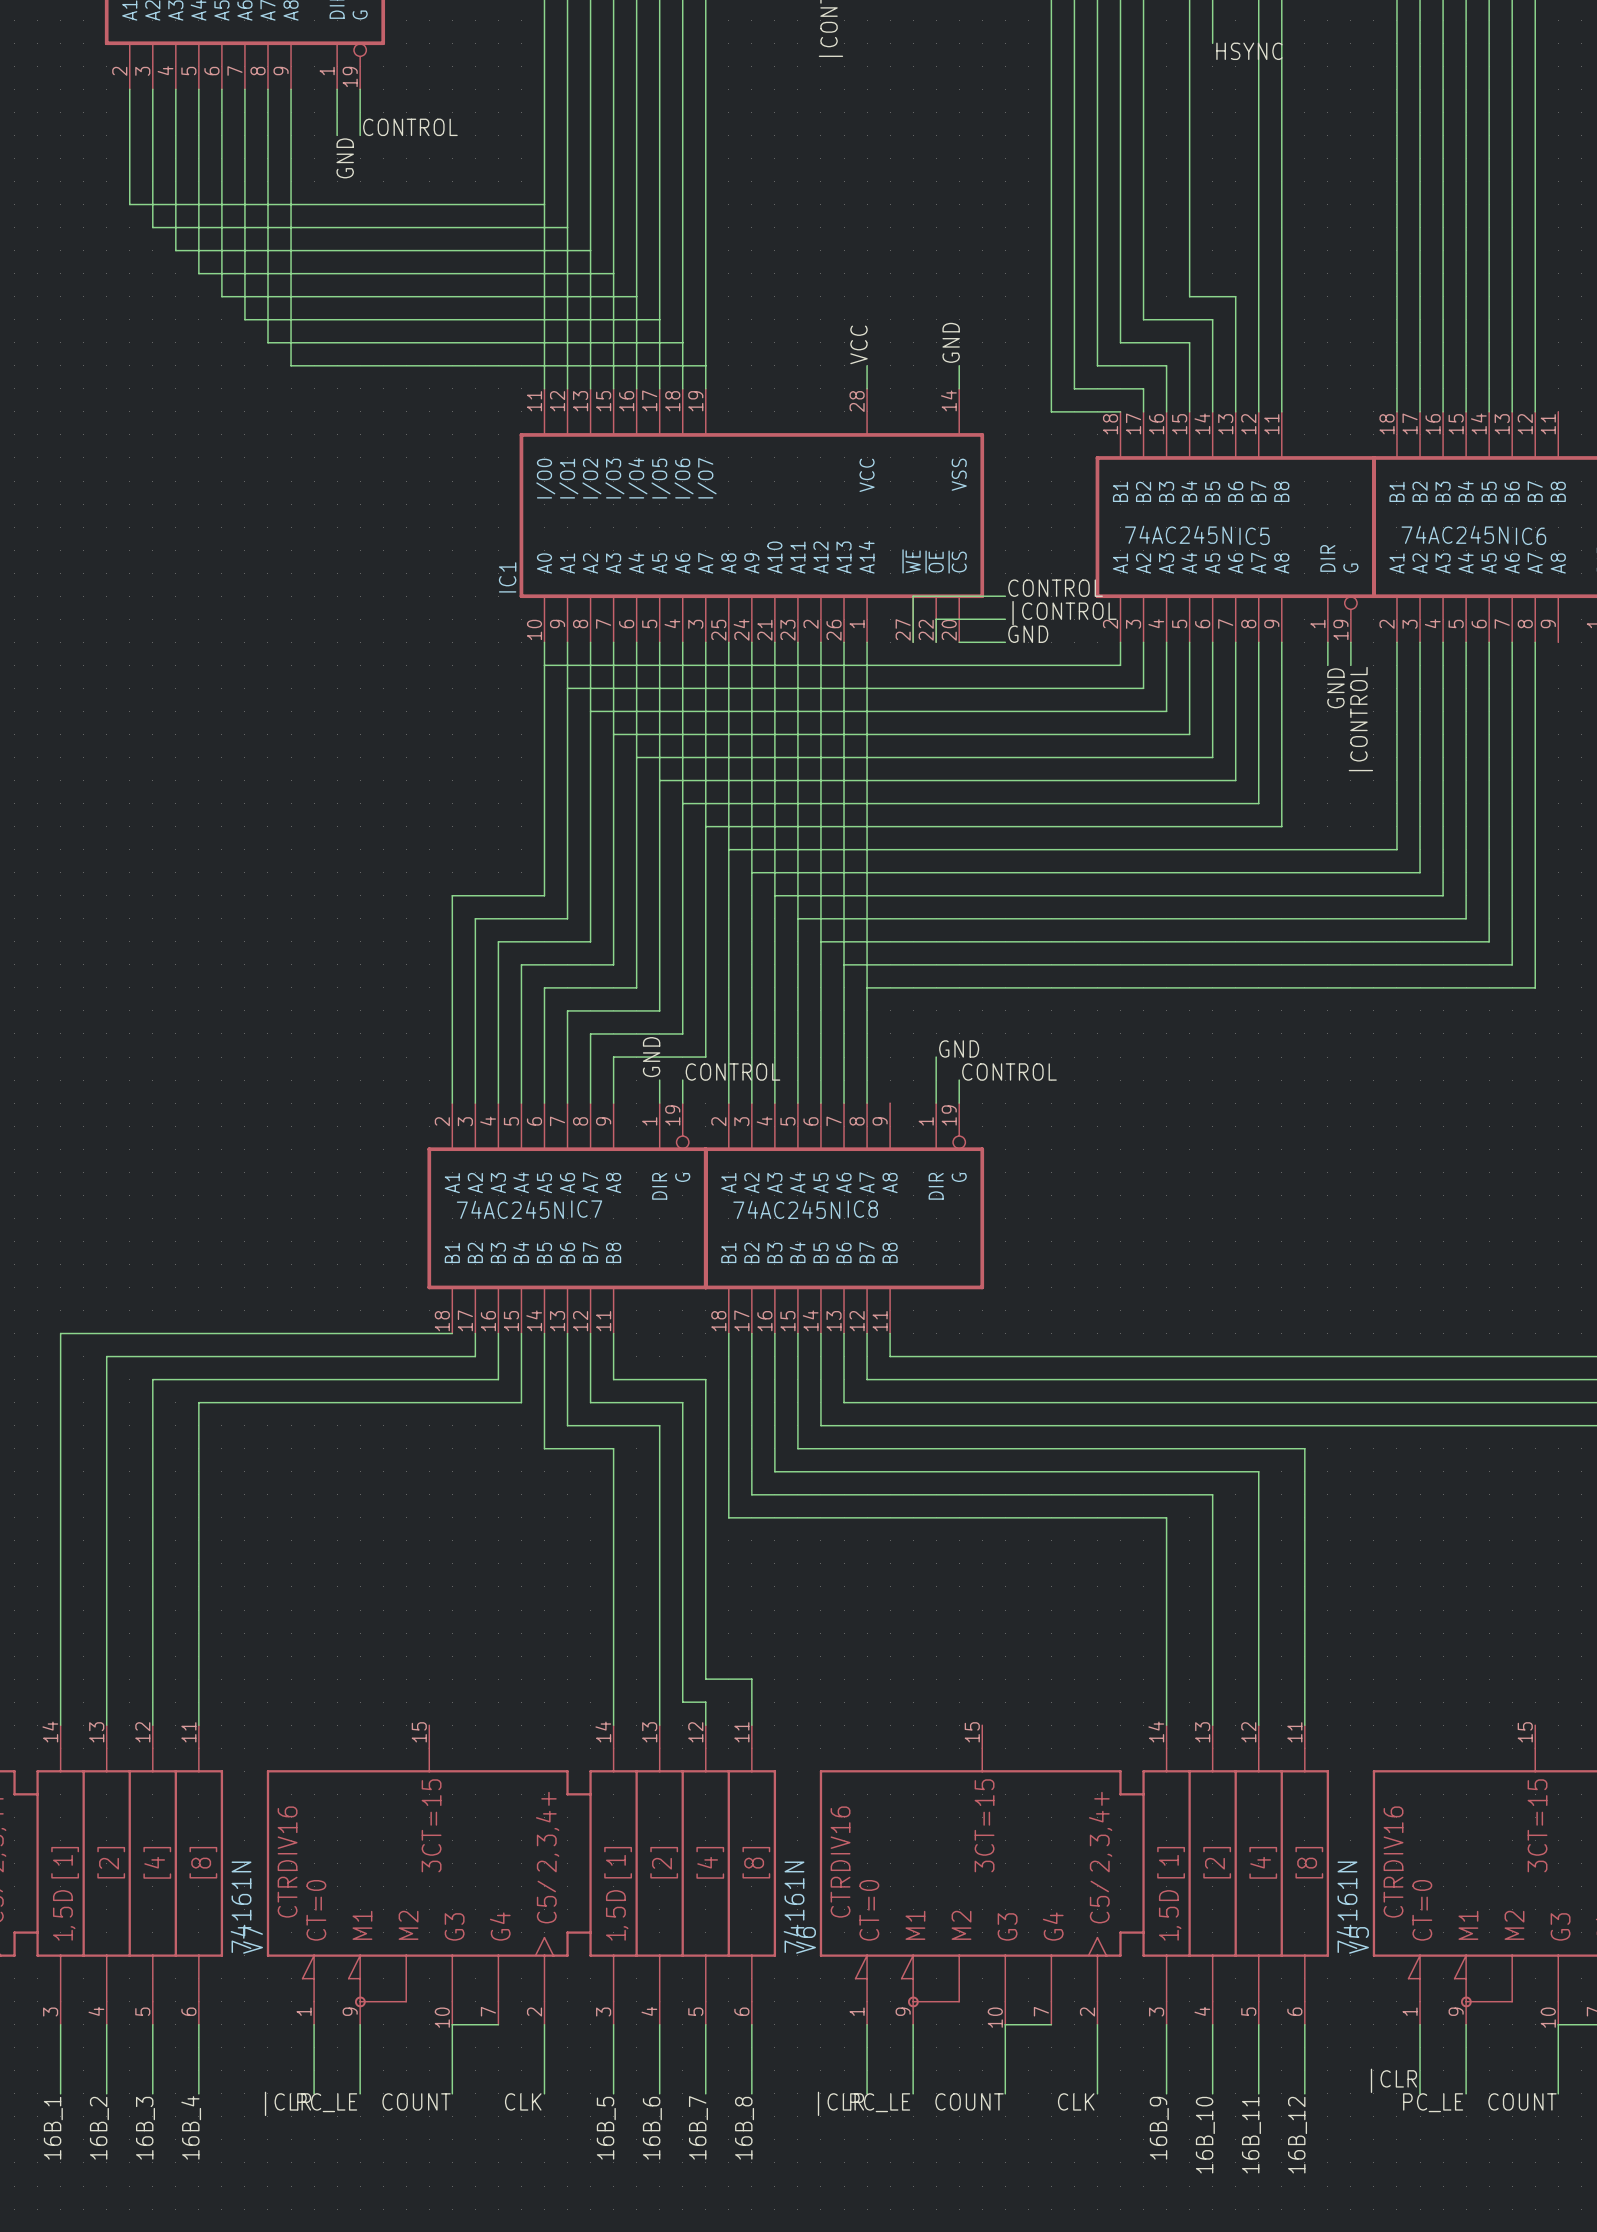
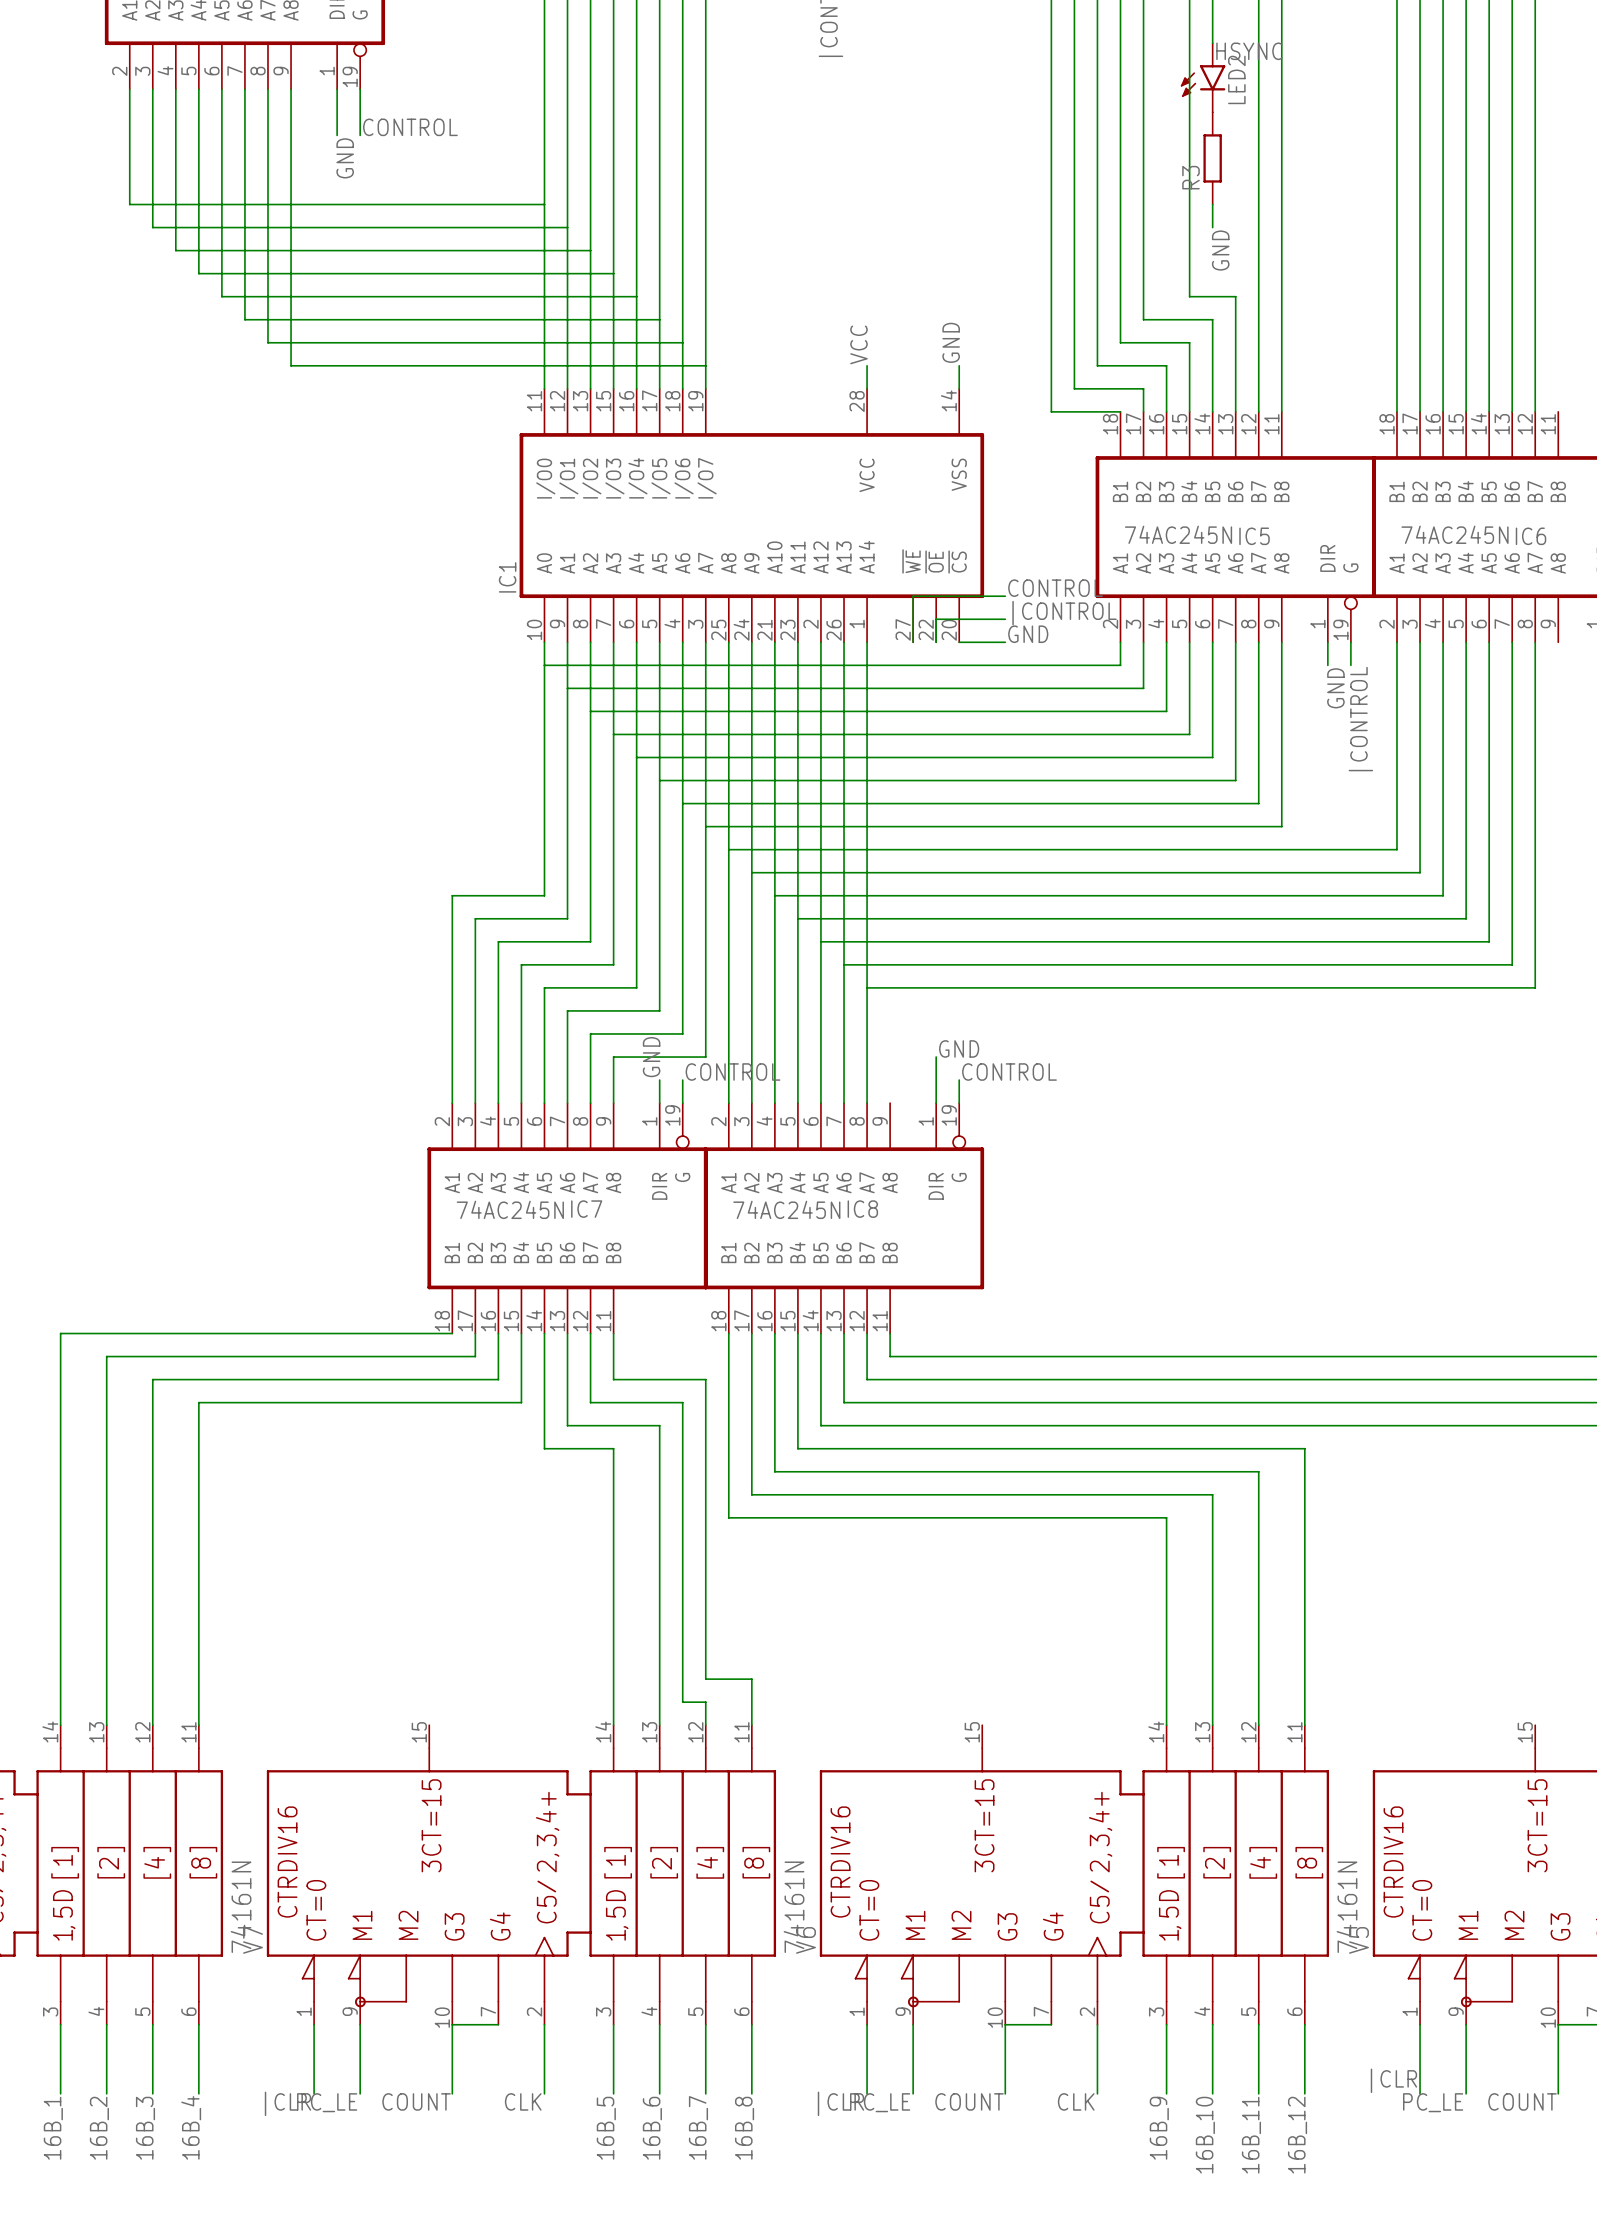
LED2: none -> (1203, 77)
R3: none -> (1212, 158)
wire: none -> (1212, 204) (1212, 227)
label: none -> GND (1220, 250)

